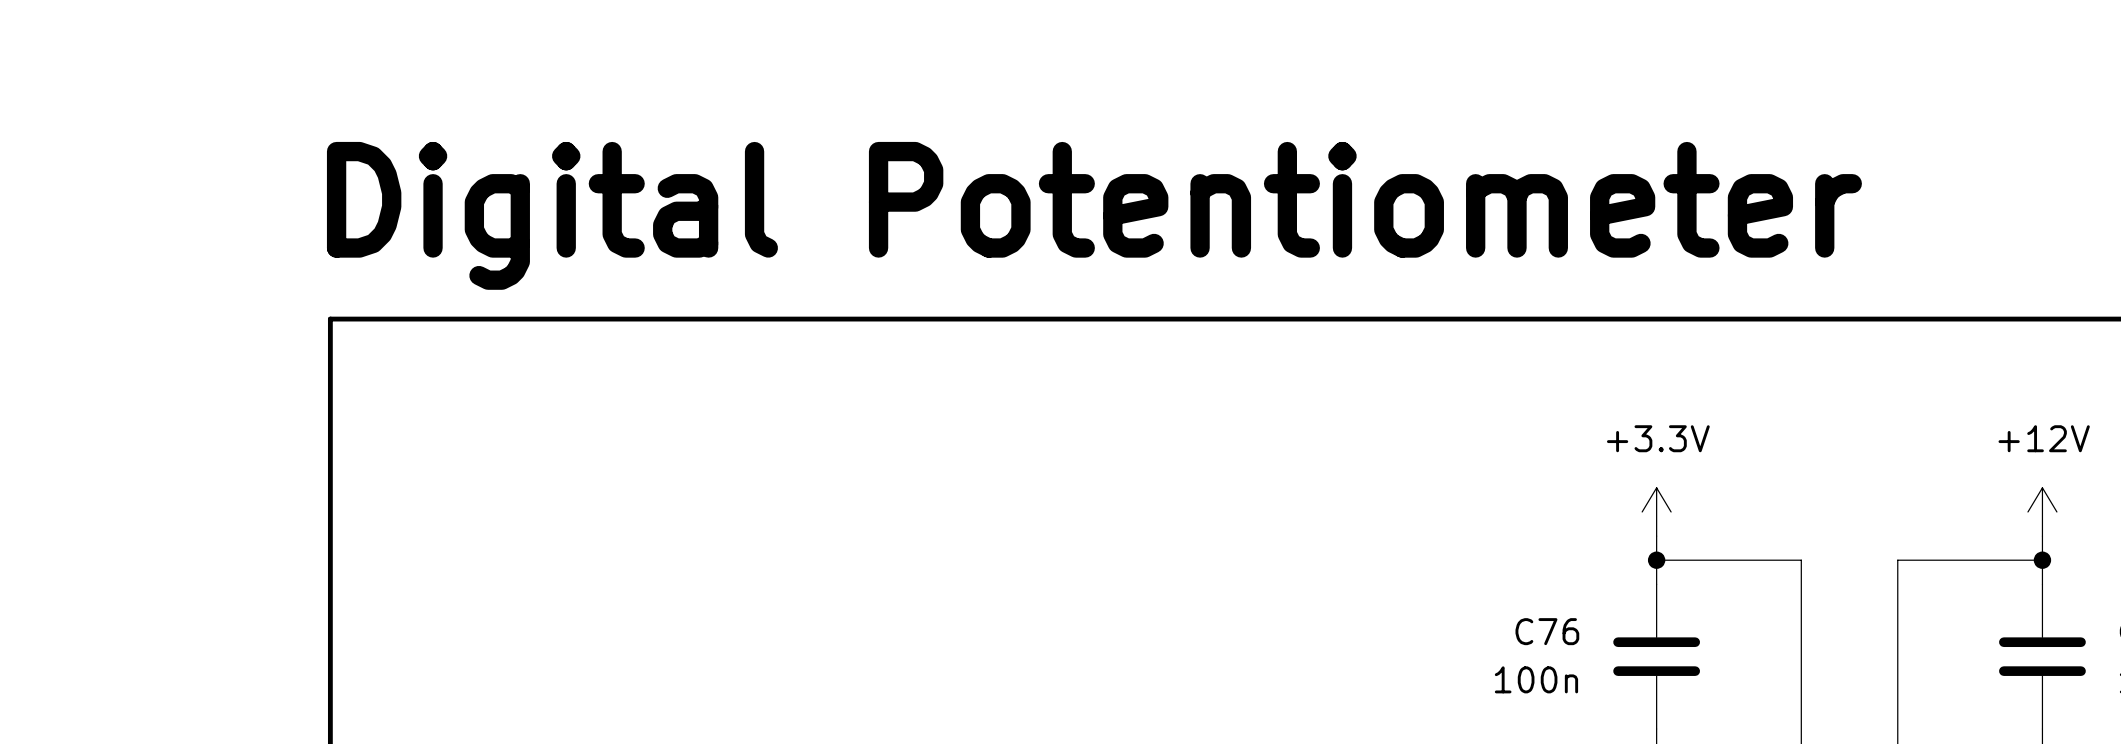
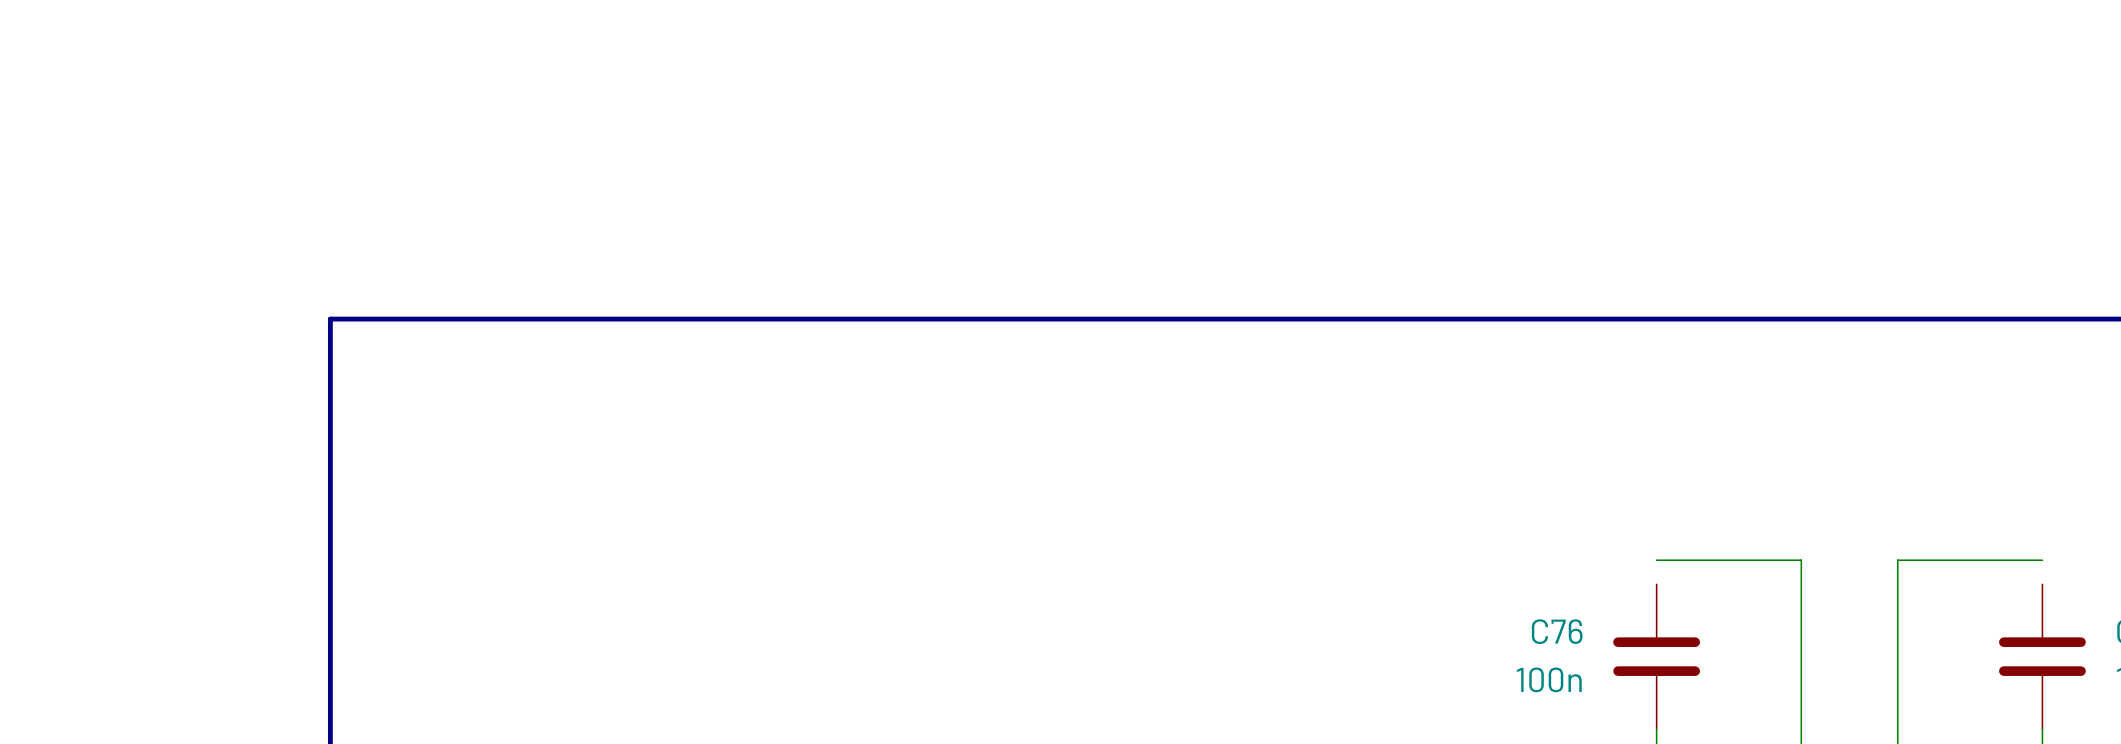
text: Digital Potentiometer (1094, 215) -> none
power symbol: +3.3V (1656, 511) -> none
power symbol: +12V (2042, 511) -> none
wire: (1656, 536) (1656, 584) -> none
wire: (2042, 536) (2042, 584) -> none
junction: (1656, 560) -> none
junction: (2042, 560) -> none

